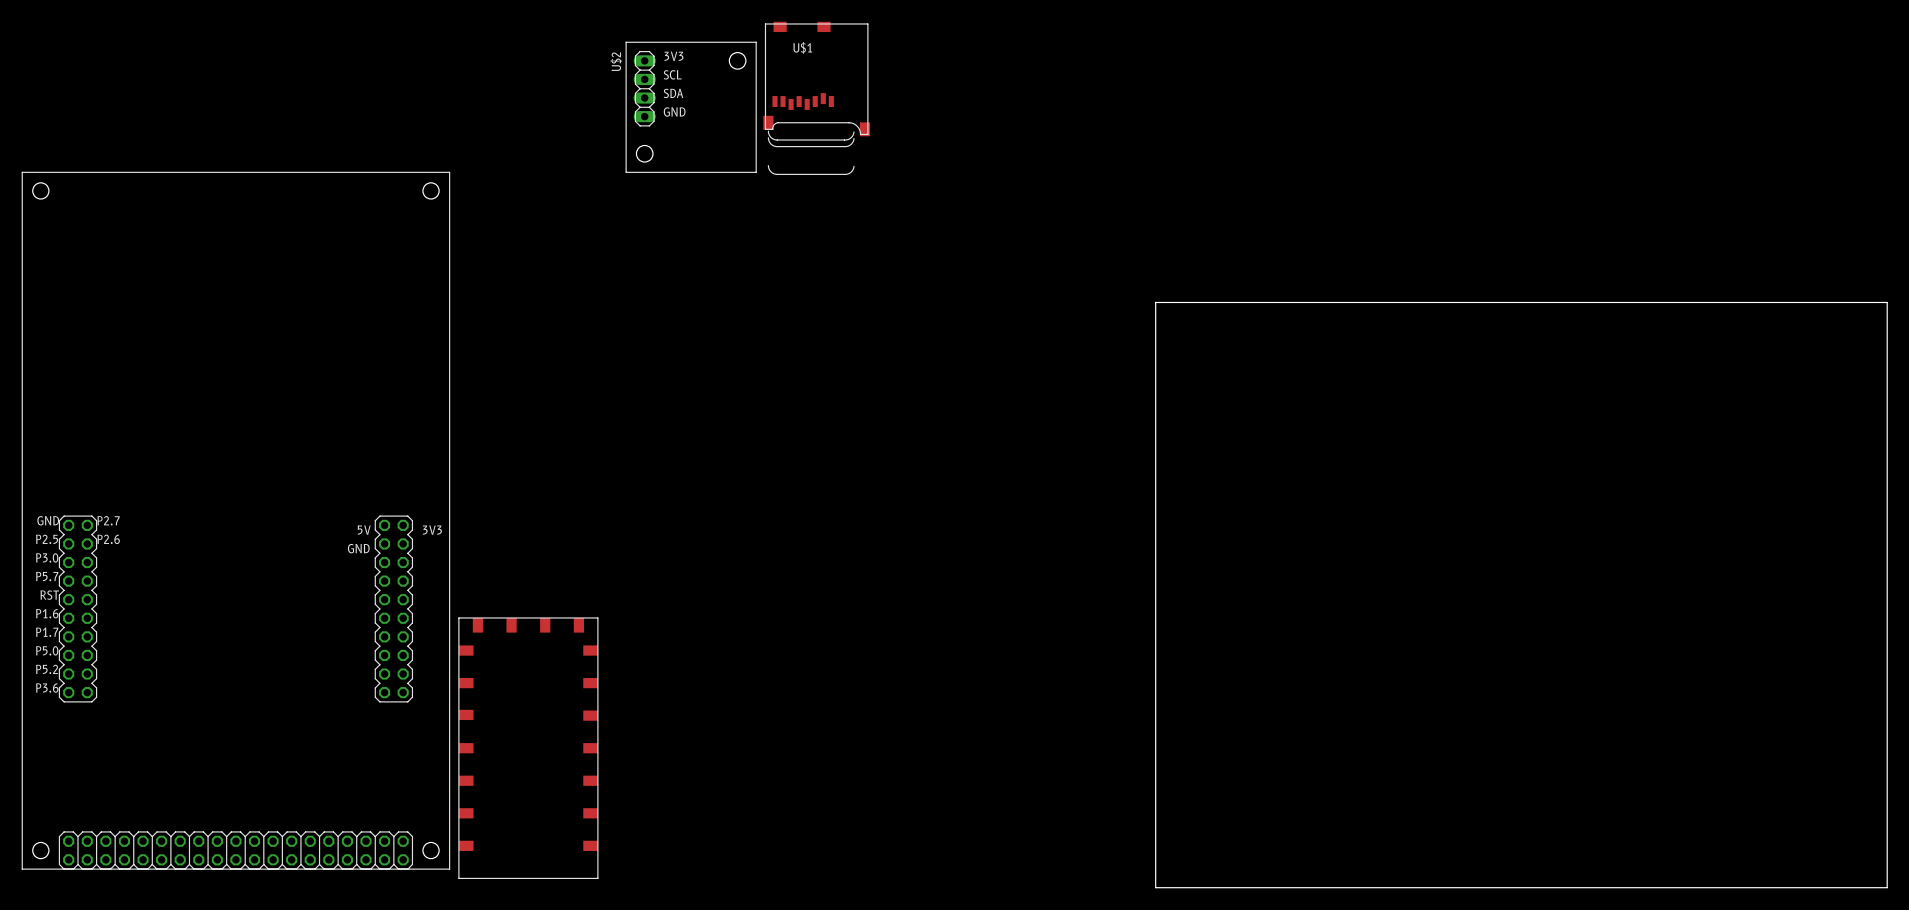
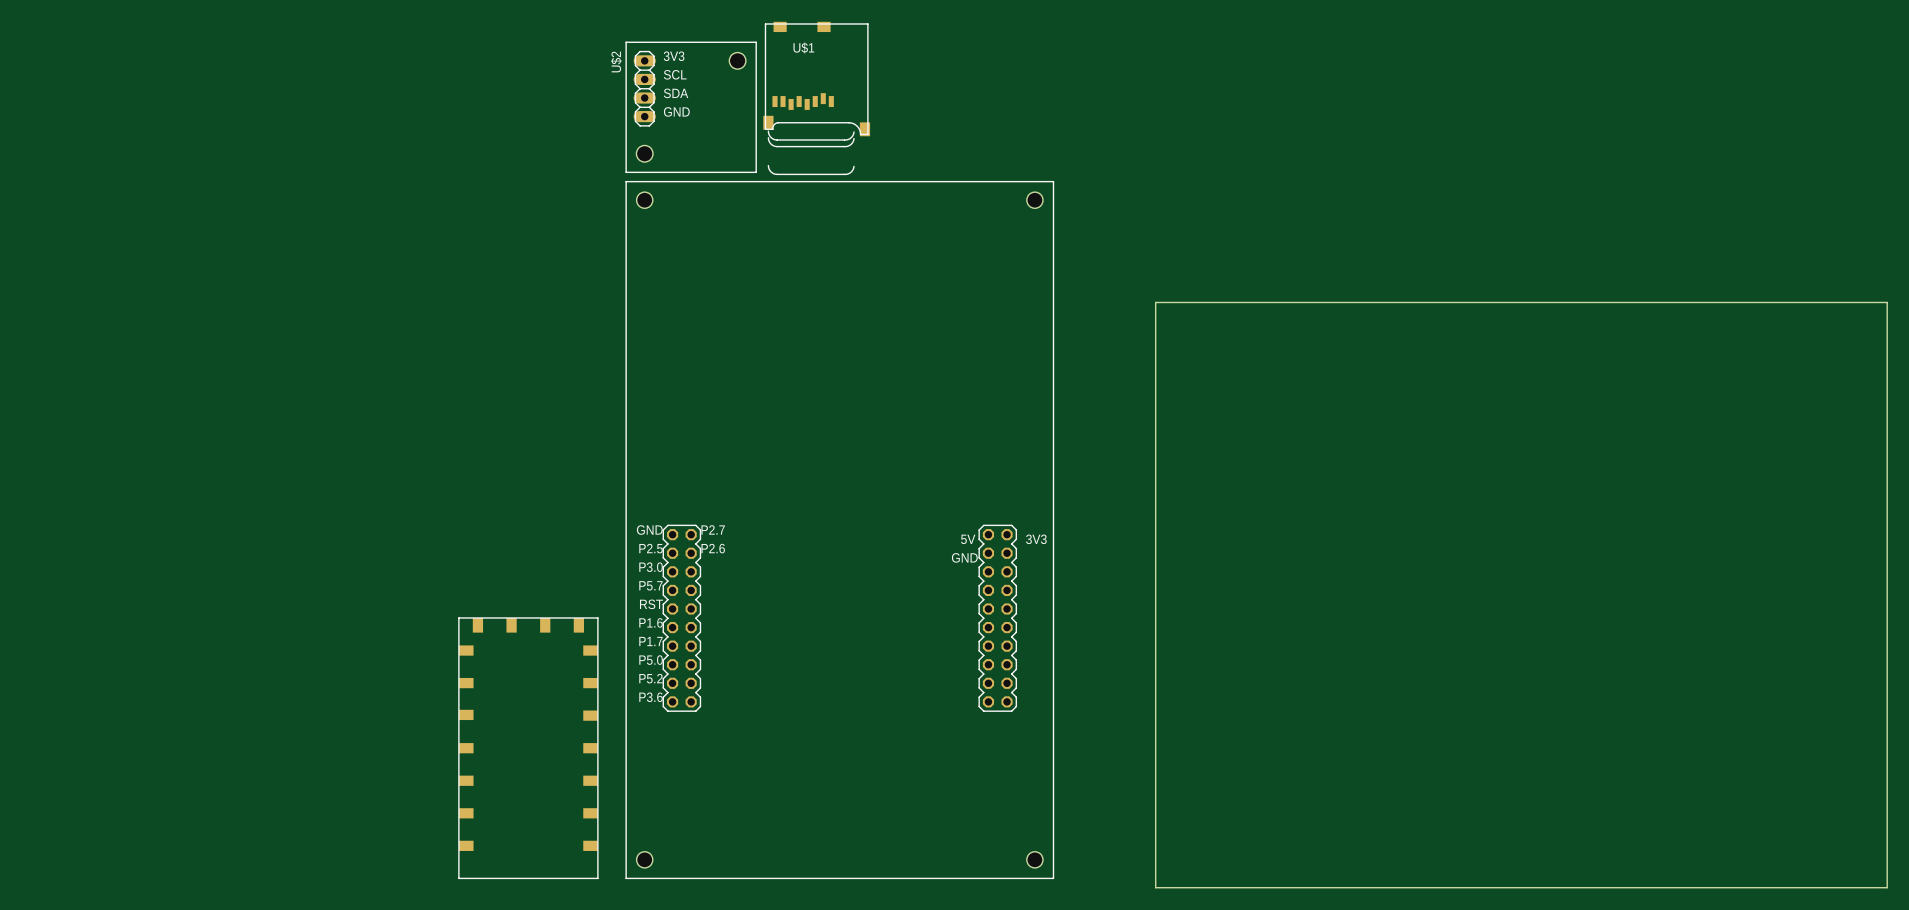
part: (235, 520) -> none
part: none -> (839, 530)

